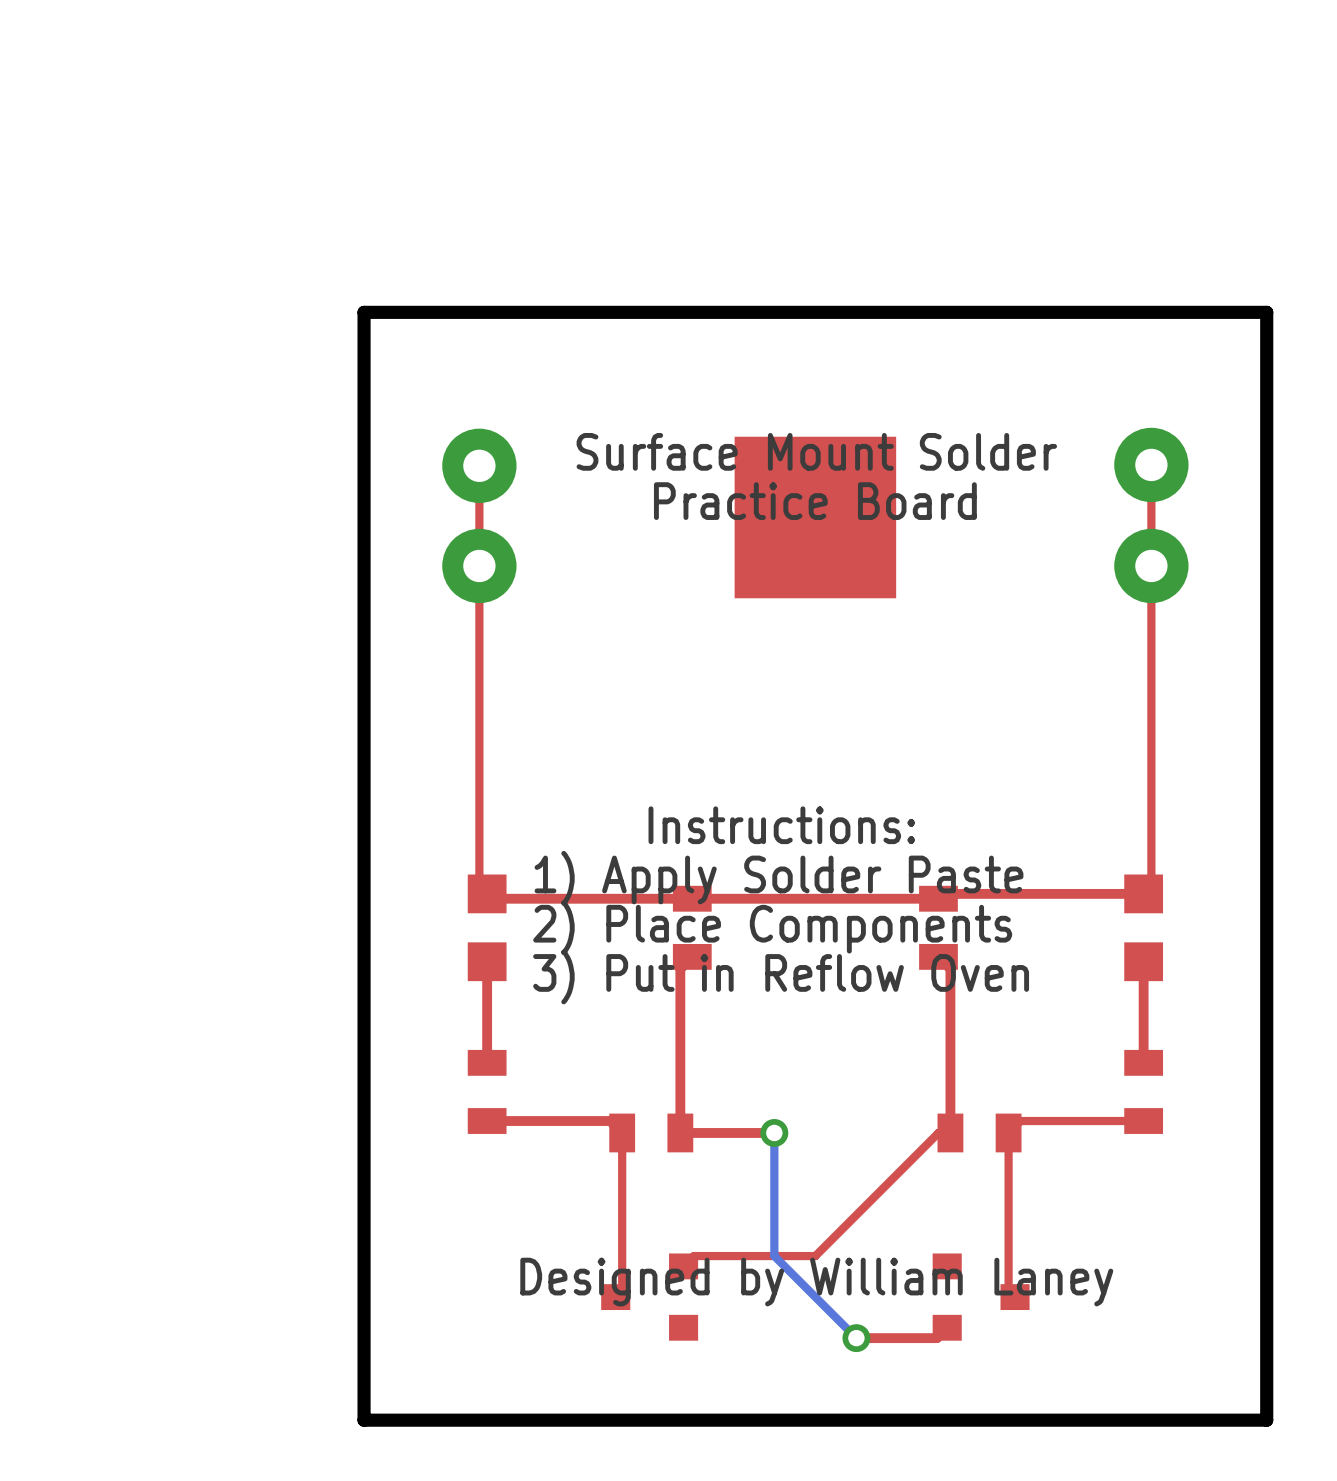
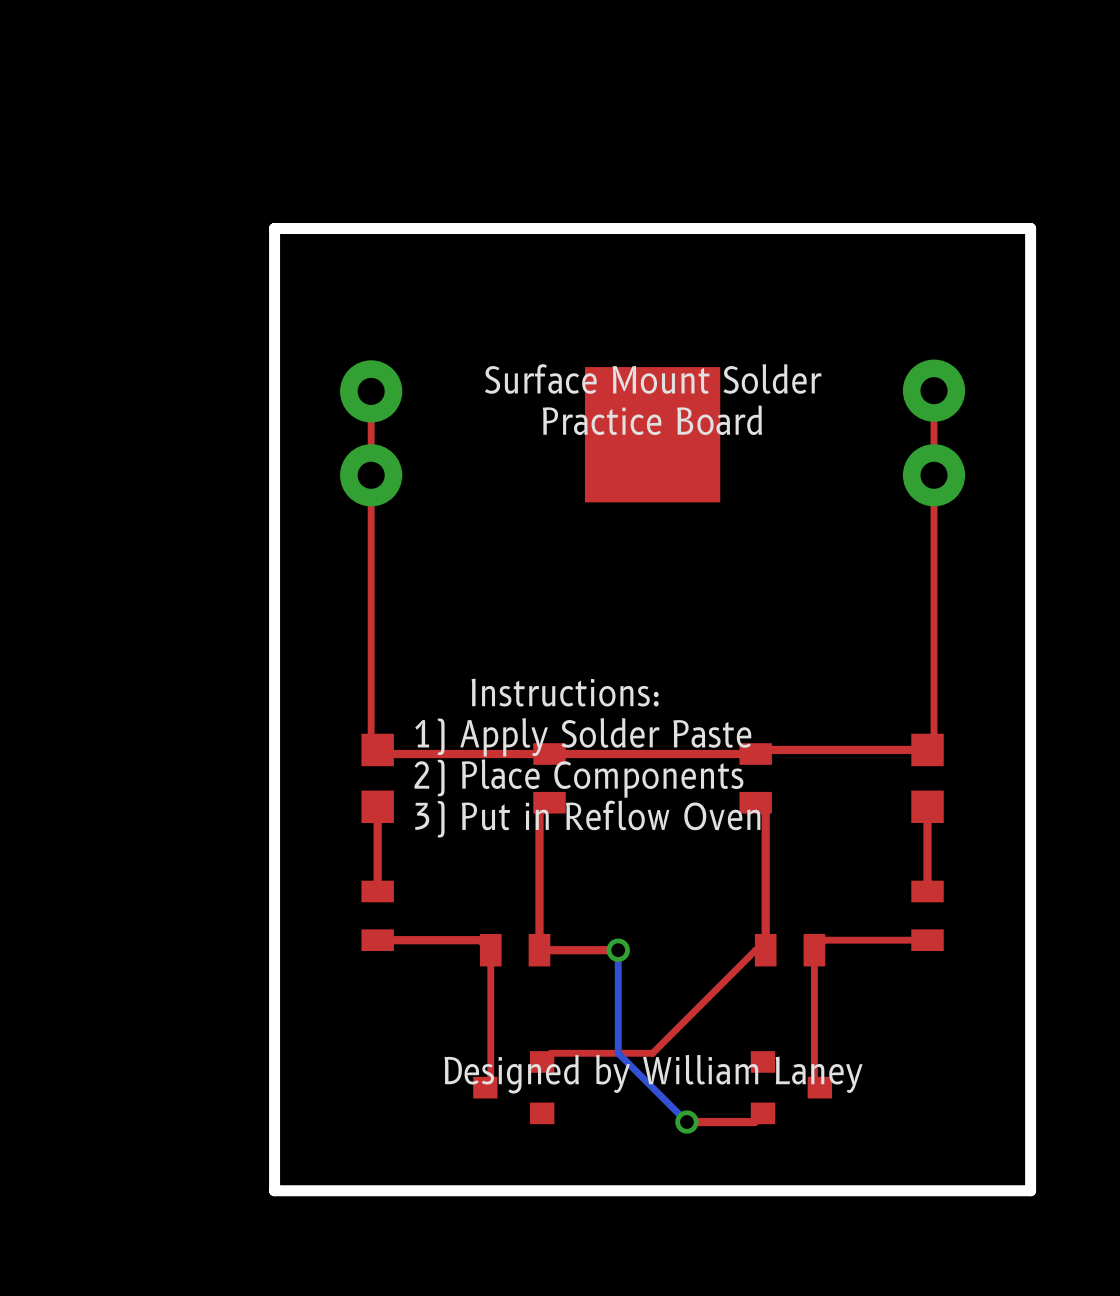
board edge: (1266, 312) (364, 312) -> (1030, 262) (1030, 228) (274, 228) (274, 262)

